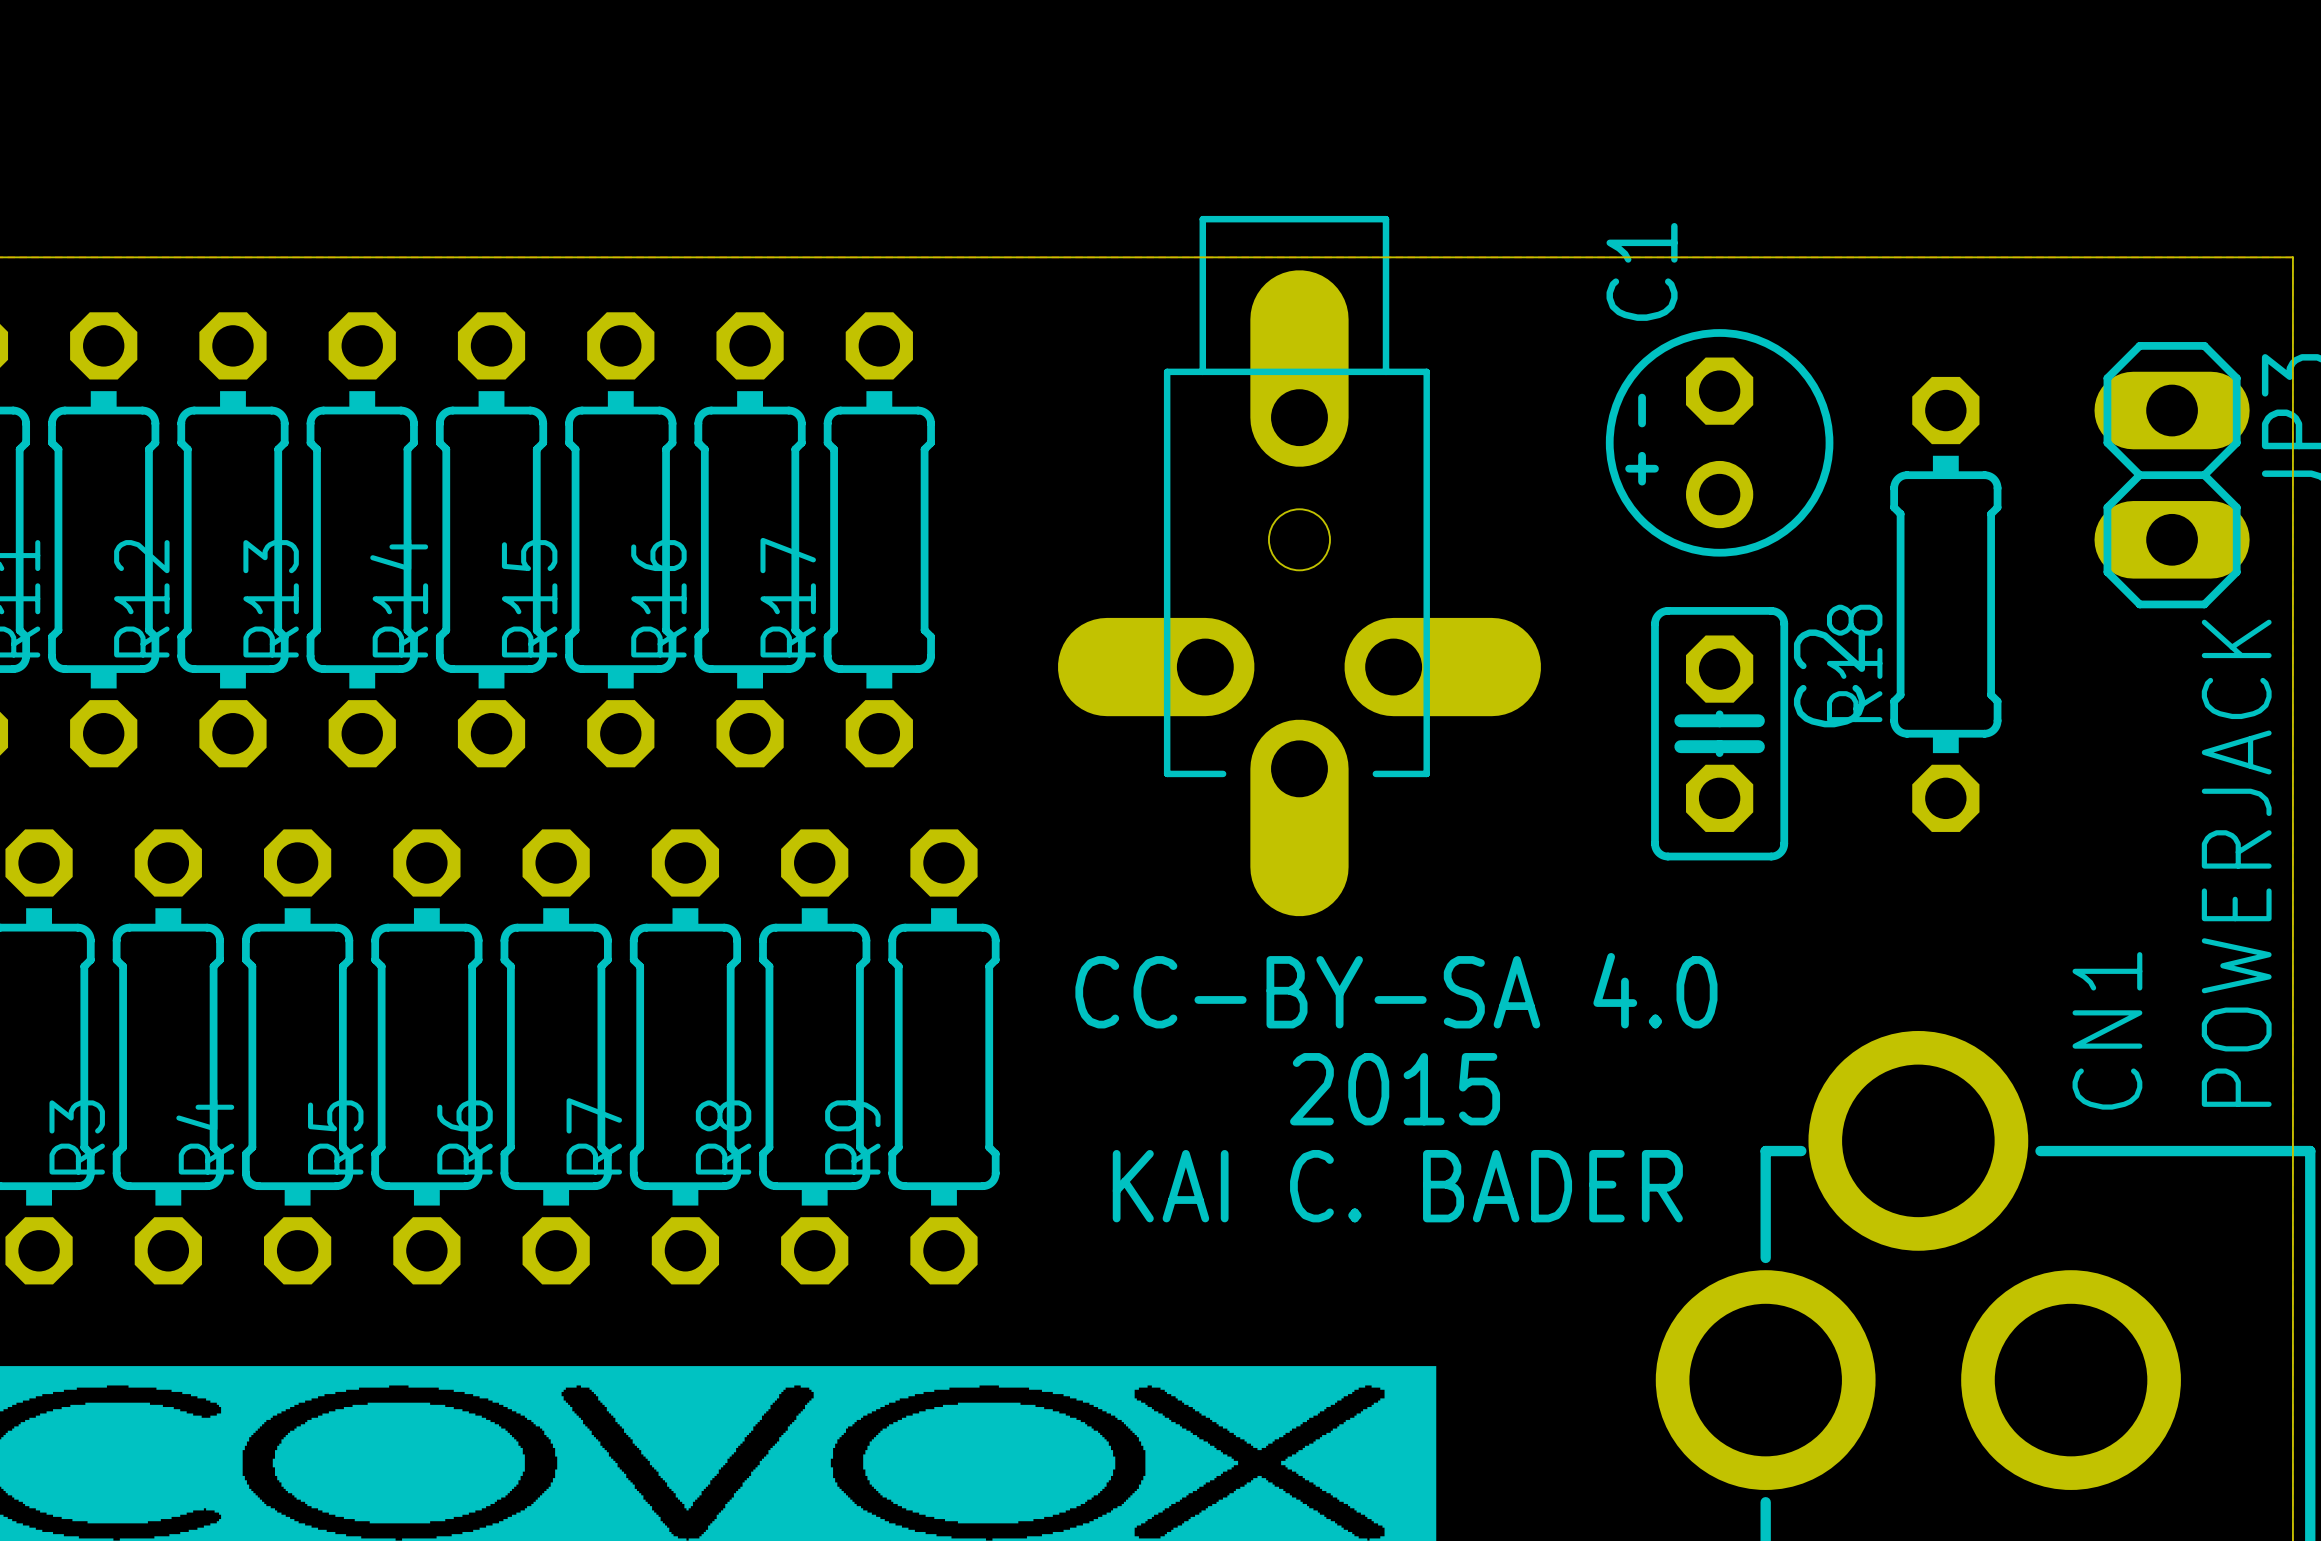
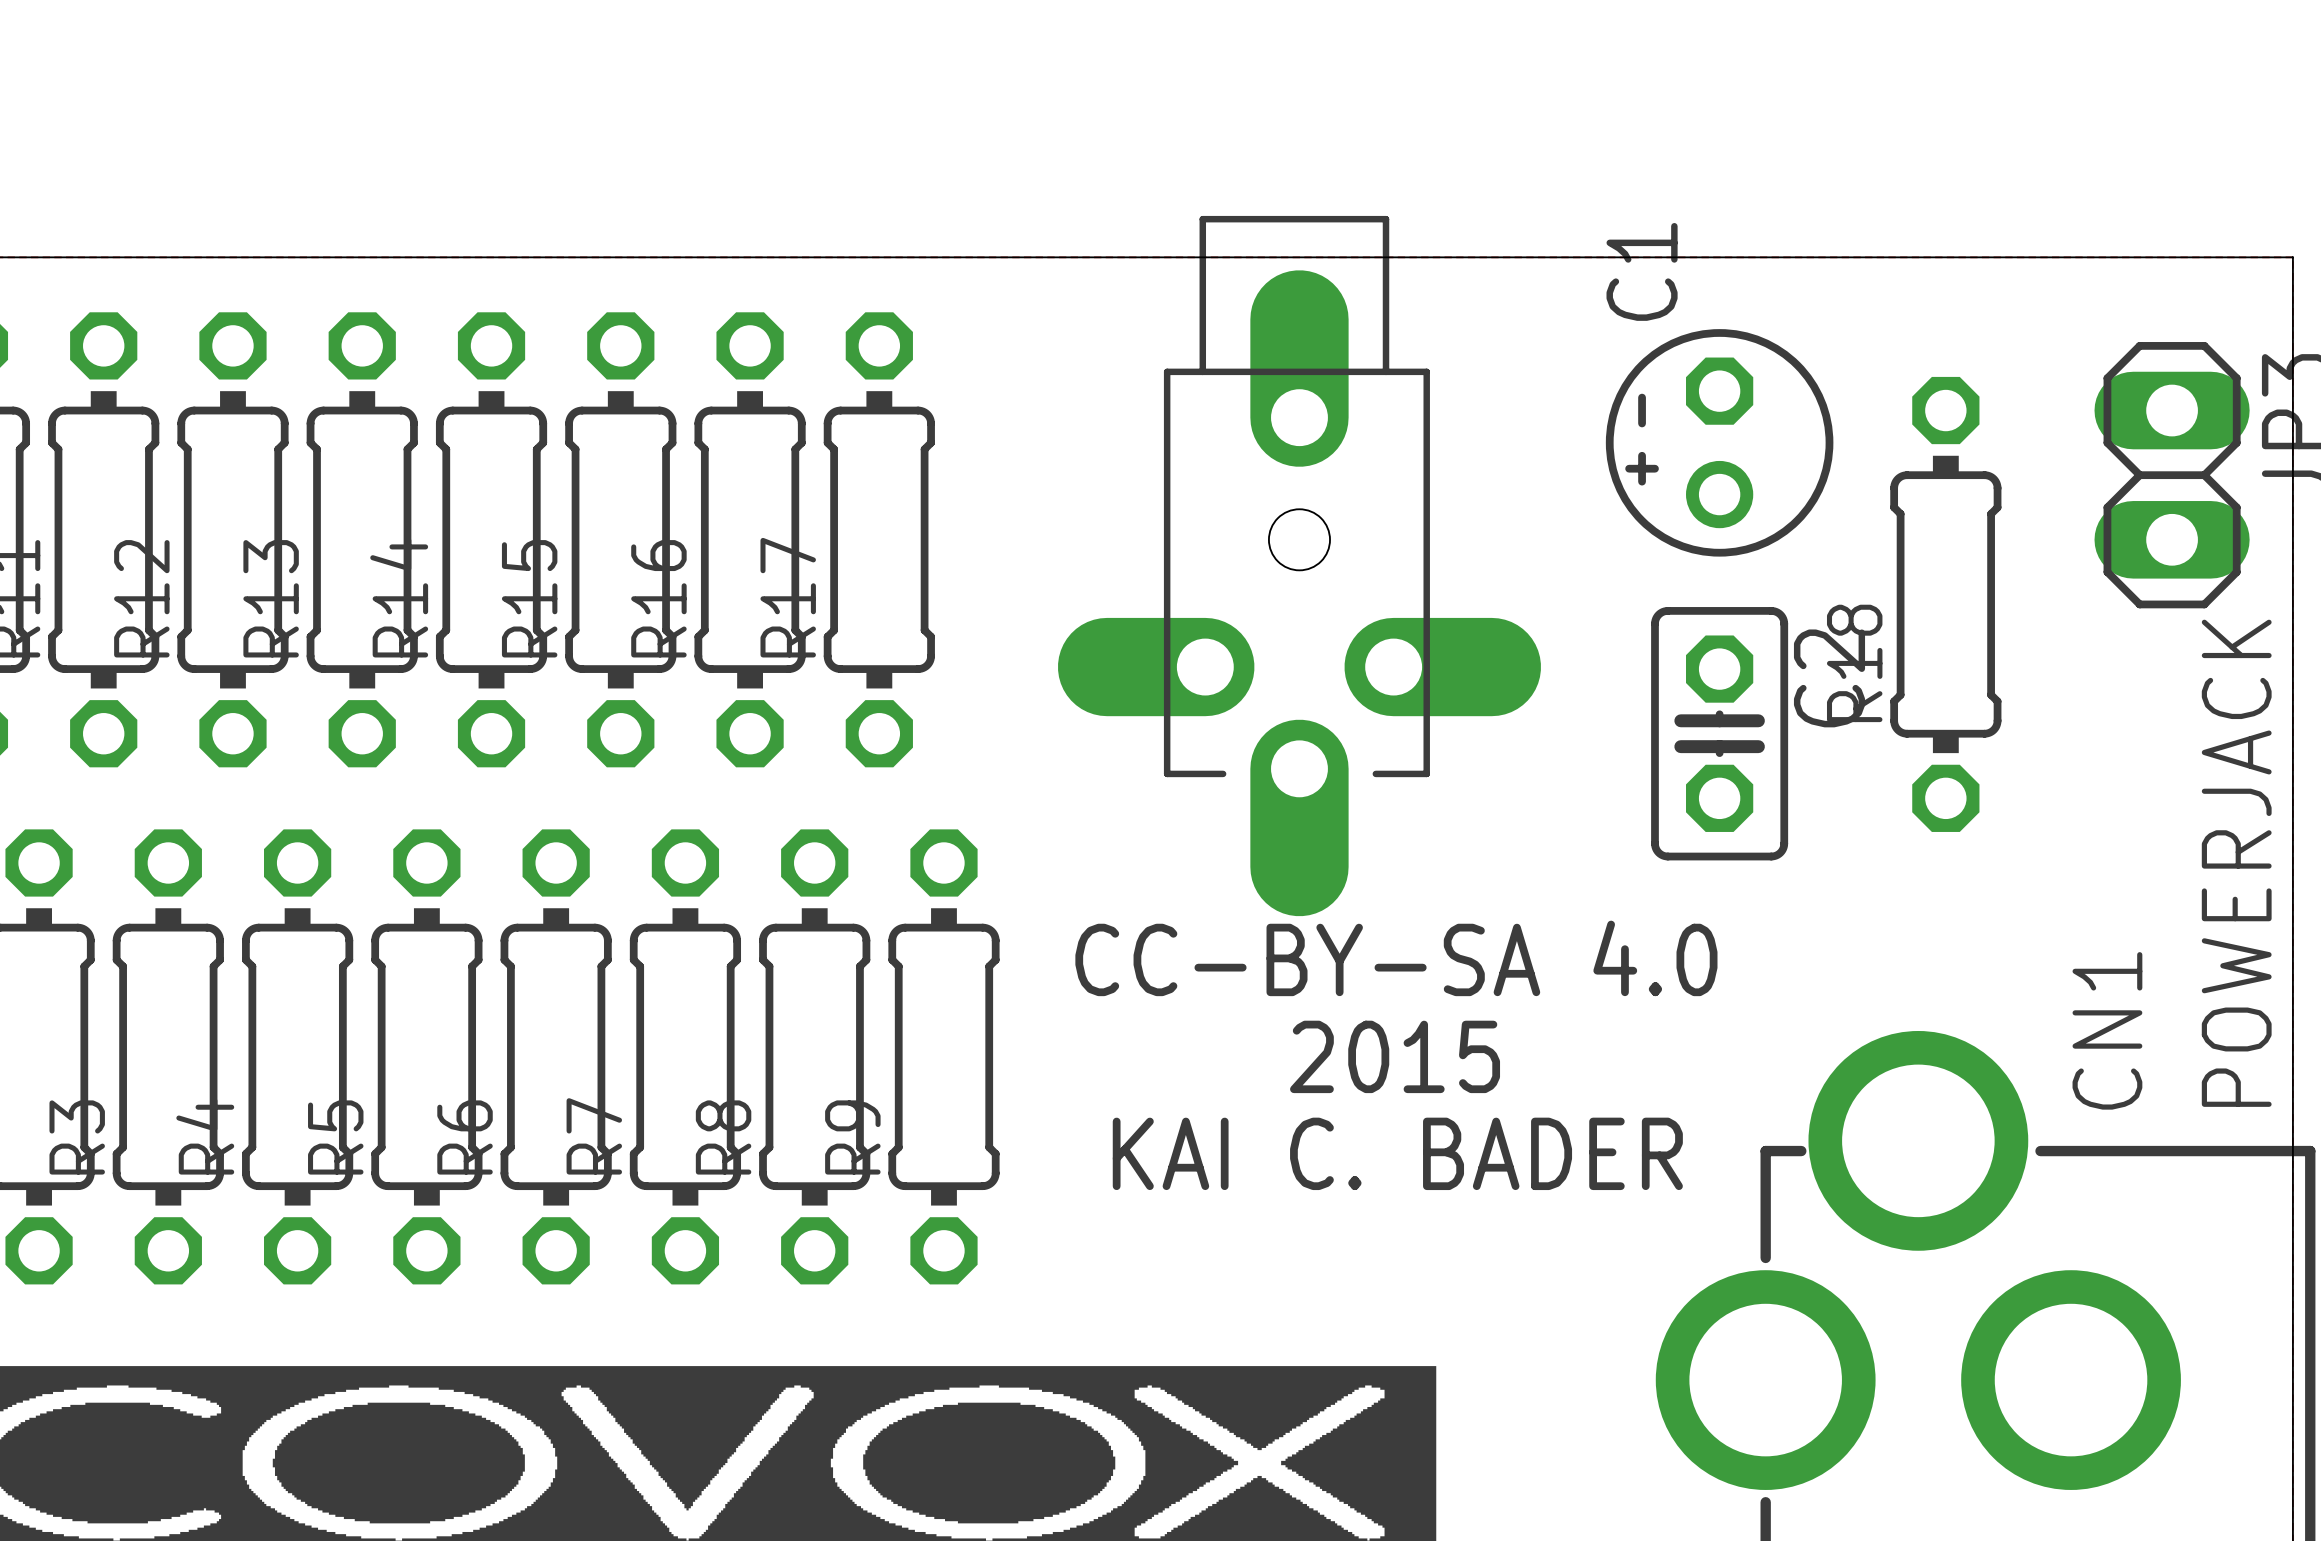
text position: CC-BY-SA 4.0 (1396, 990) -> CC-BY-SA 4.0 (1396, 958)
text position: 2015 (1395, 1089) -> 2015 (1395, 1056)
text position: KAI C. BADER (1397, 1186) -> KAI C. BADER (1397, 1153)

